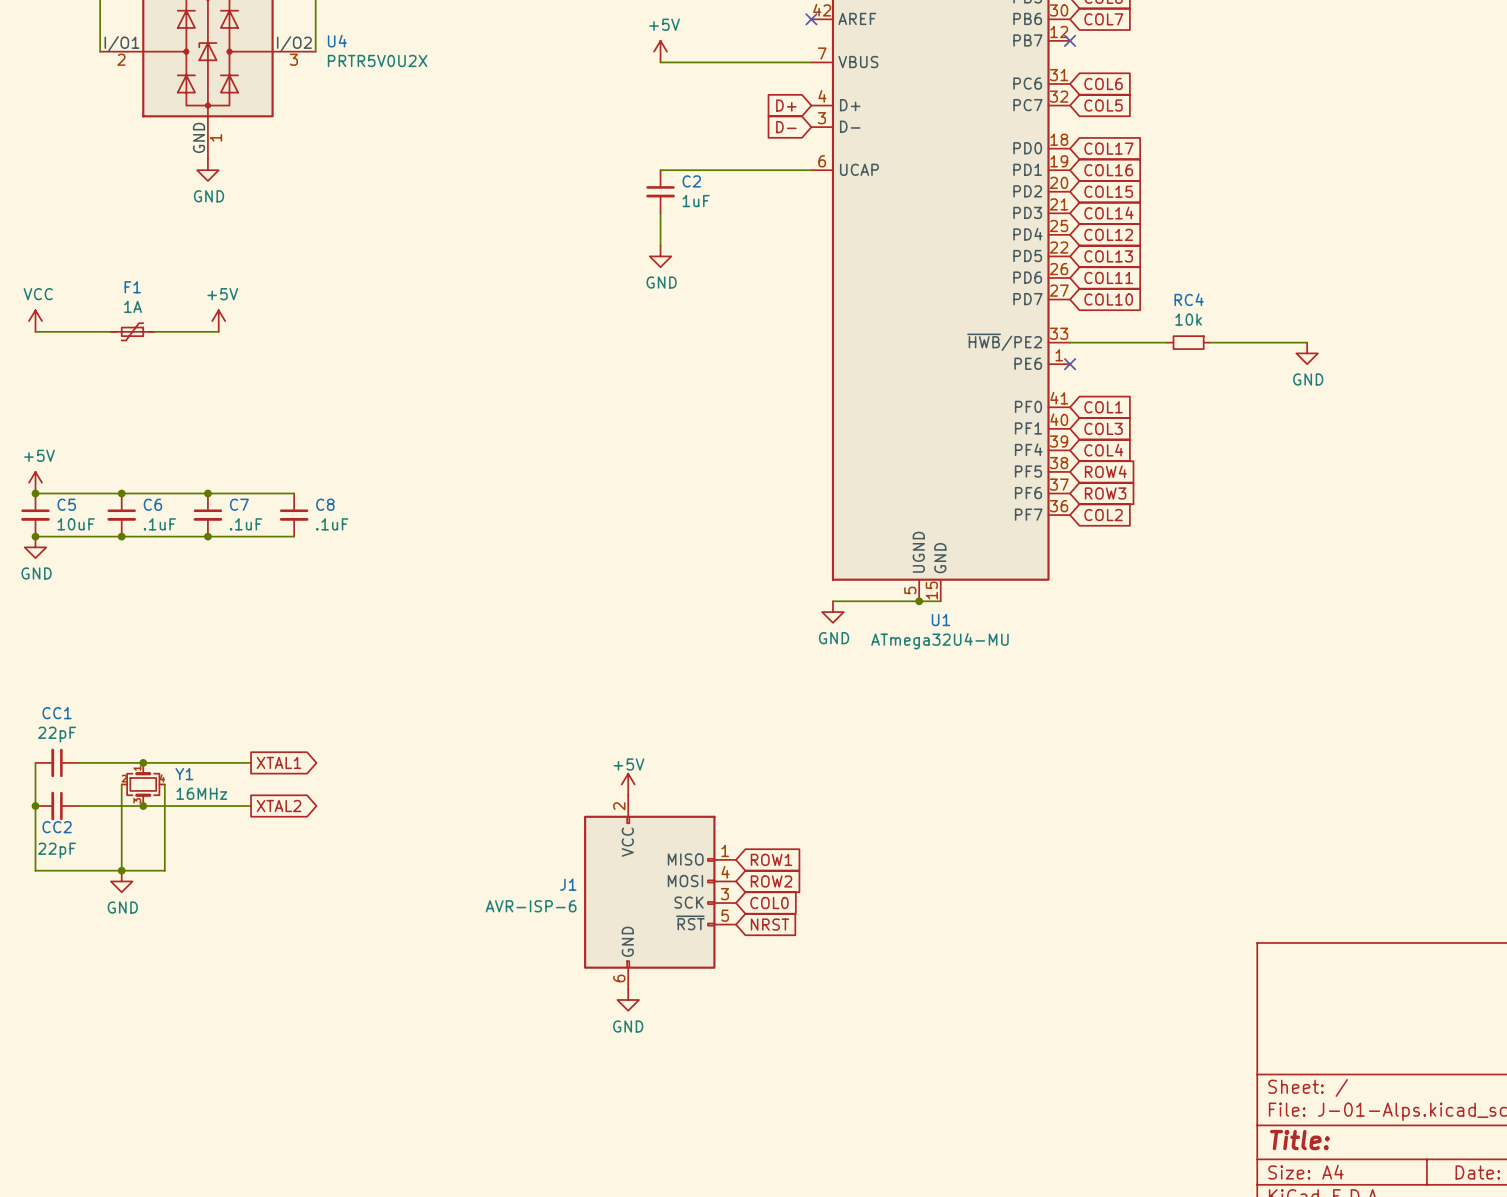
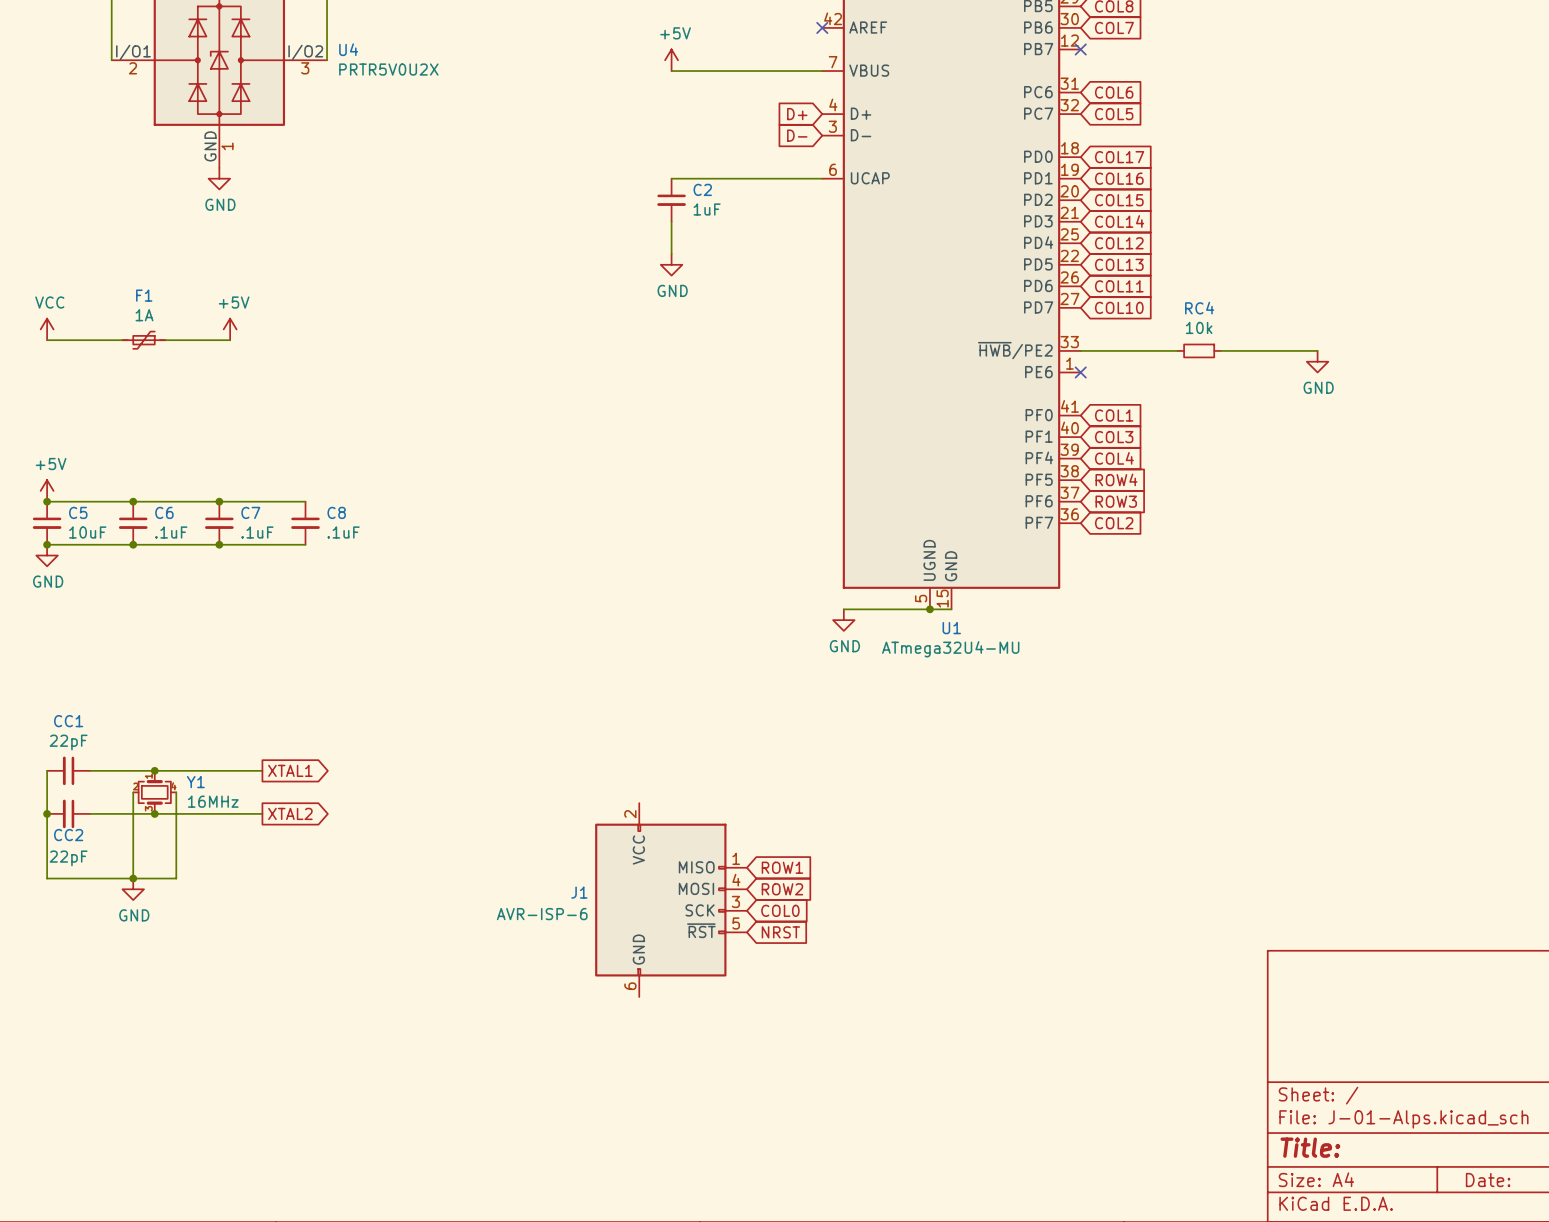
power symbol: +5V (628, 784) -> none
power symbol: GND (628, 1000) -> none

